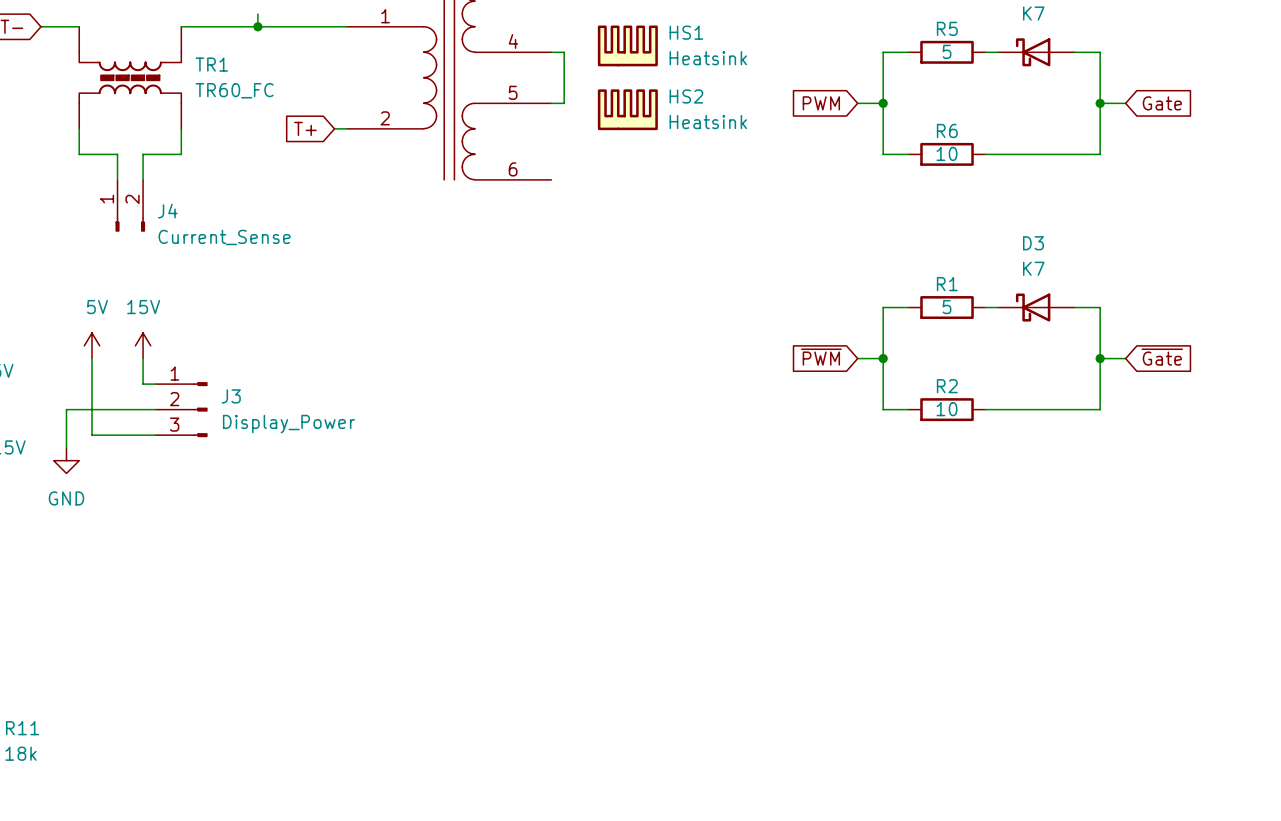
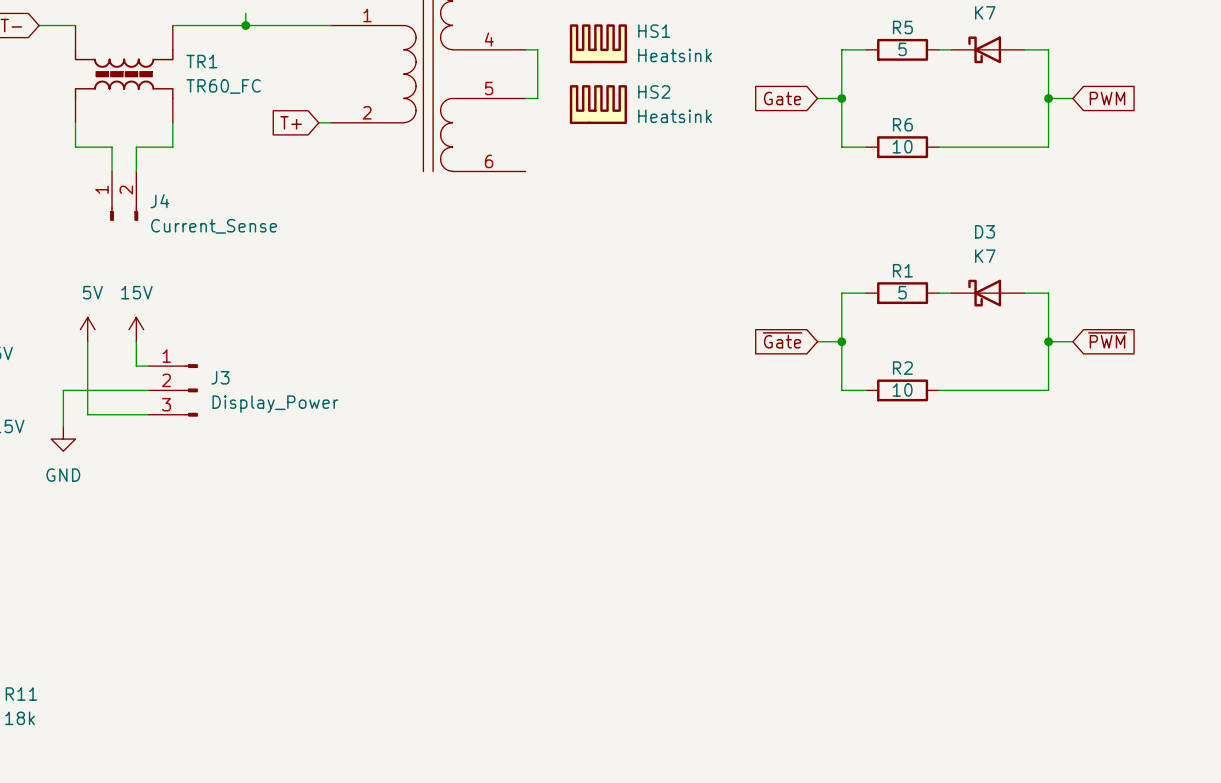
global label: PWM (821, 103) -> Gate (782, 98)
global label: Gate (1162, 103) -> PWM (1107, 98)
global label: ~{PWM} (821, 357) -> ~{Gate} (782, 340)
global label: ~{Gate} (1162, 357) -> ~{PWM} (1107, 340)

